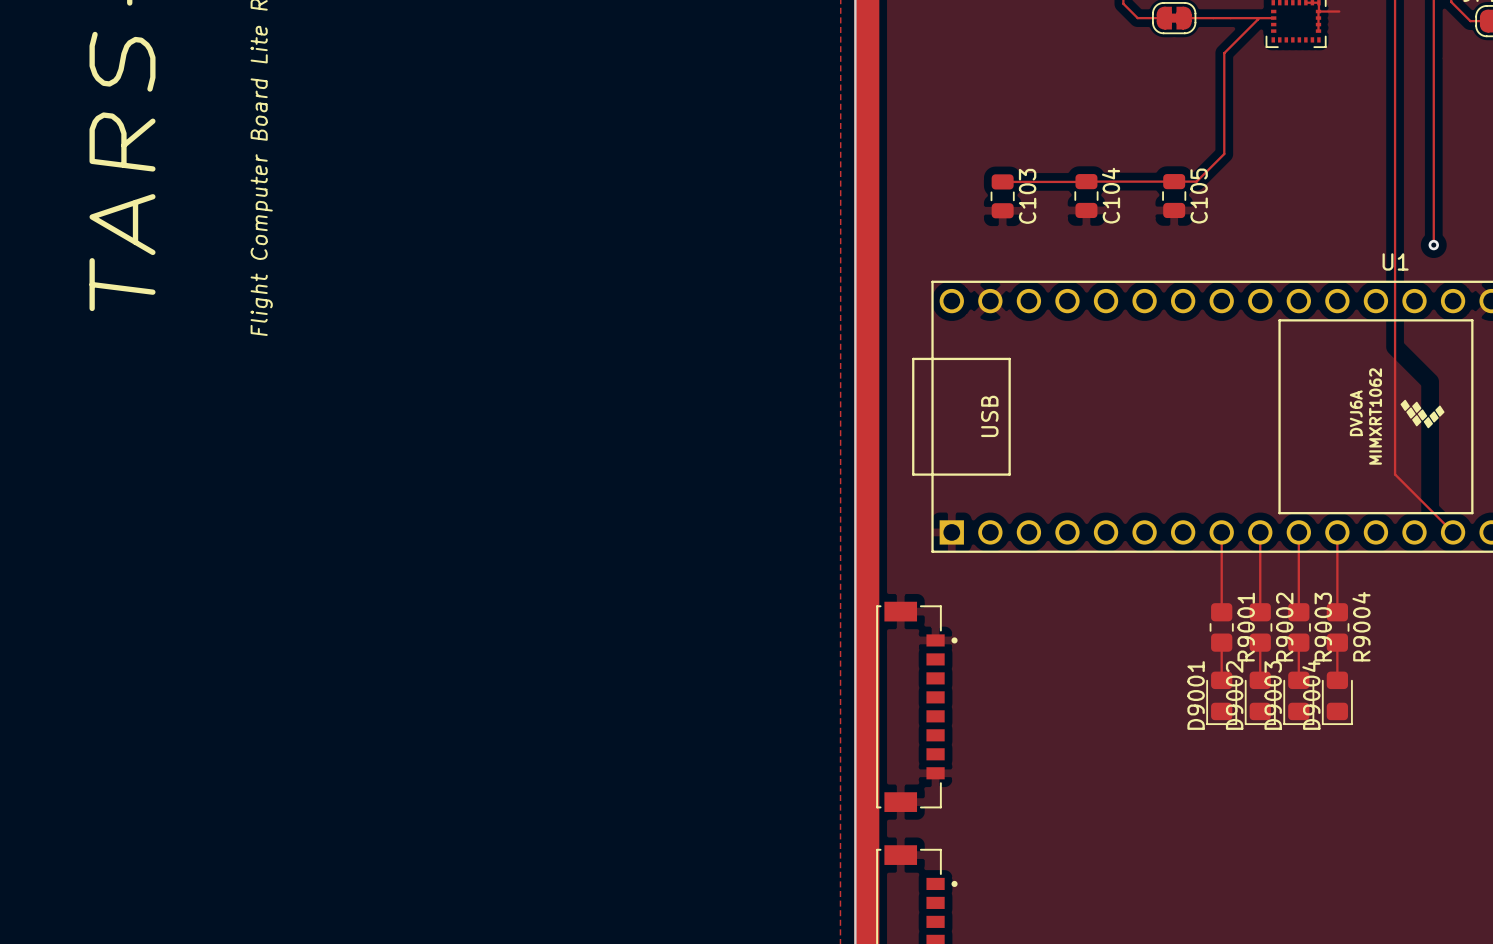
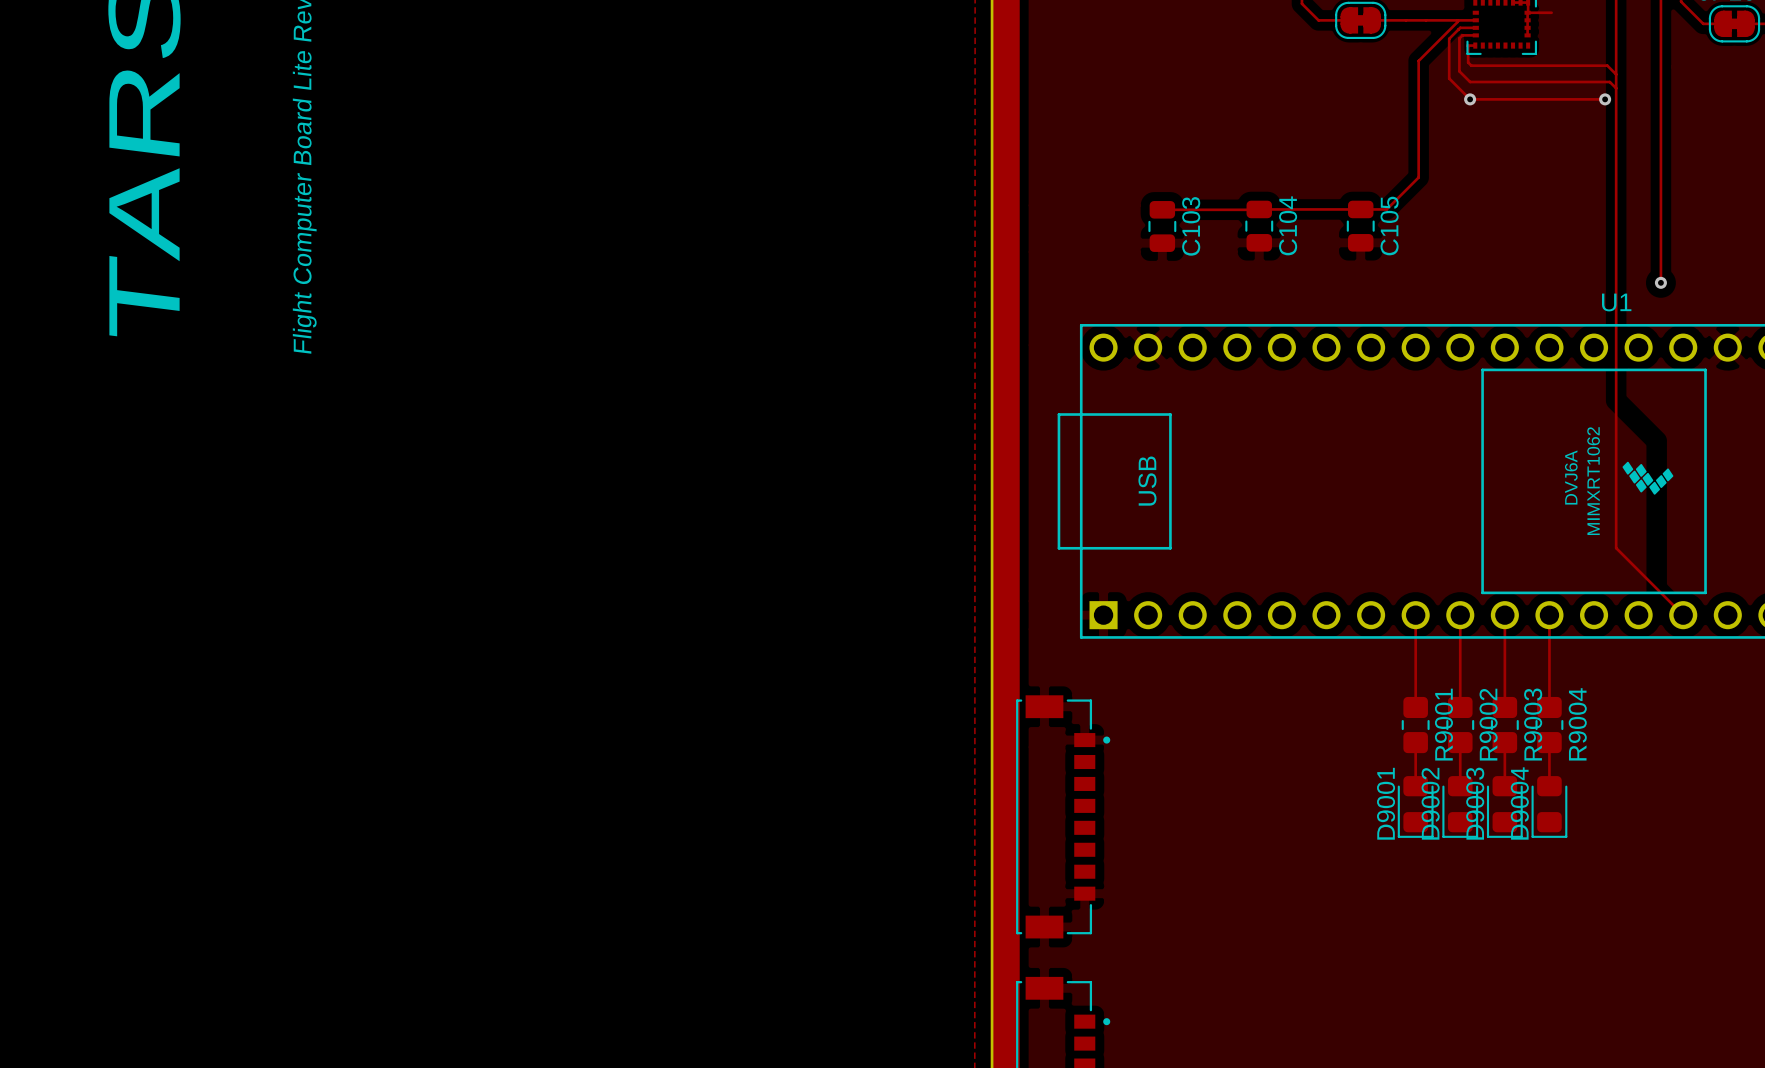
track: none -> (1475, 27) (1460, 27) (1449, 38) (1449, 78) (1470, 99) (1605, 99)
track: none -> (1475, 35) (1462, 35) (1459, 38) (1459, 71) (1470, 82) (1609, 82) (1616, 88)
track: none -> (1475, 45) (1467, 45) (1468, 62) (1471, 65) (1607, 65) (1616, 74)
via: none -> (1470, 99)
via: none -> (1605, 99)

